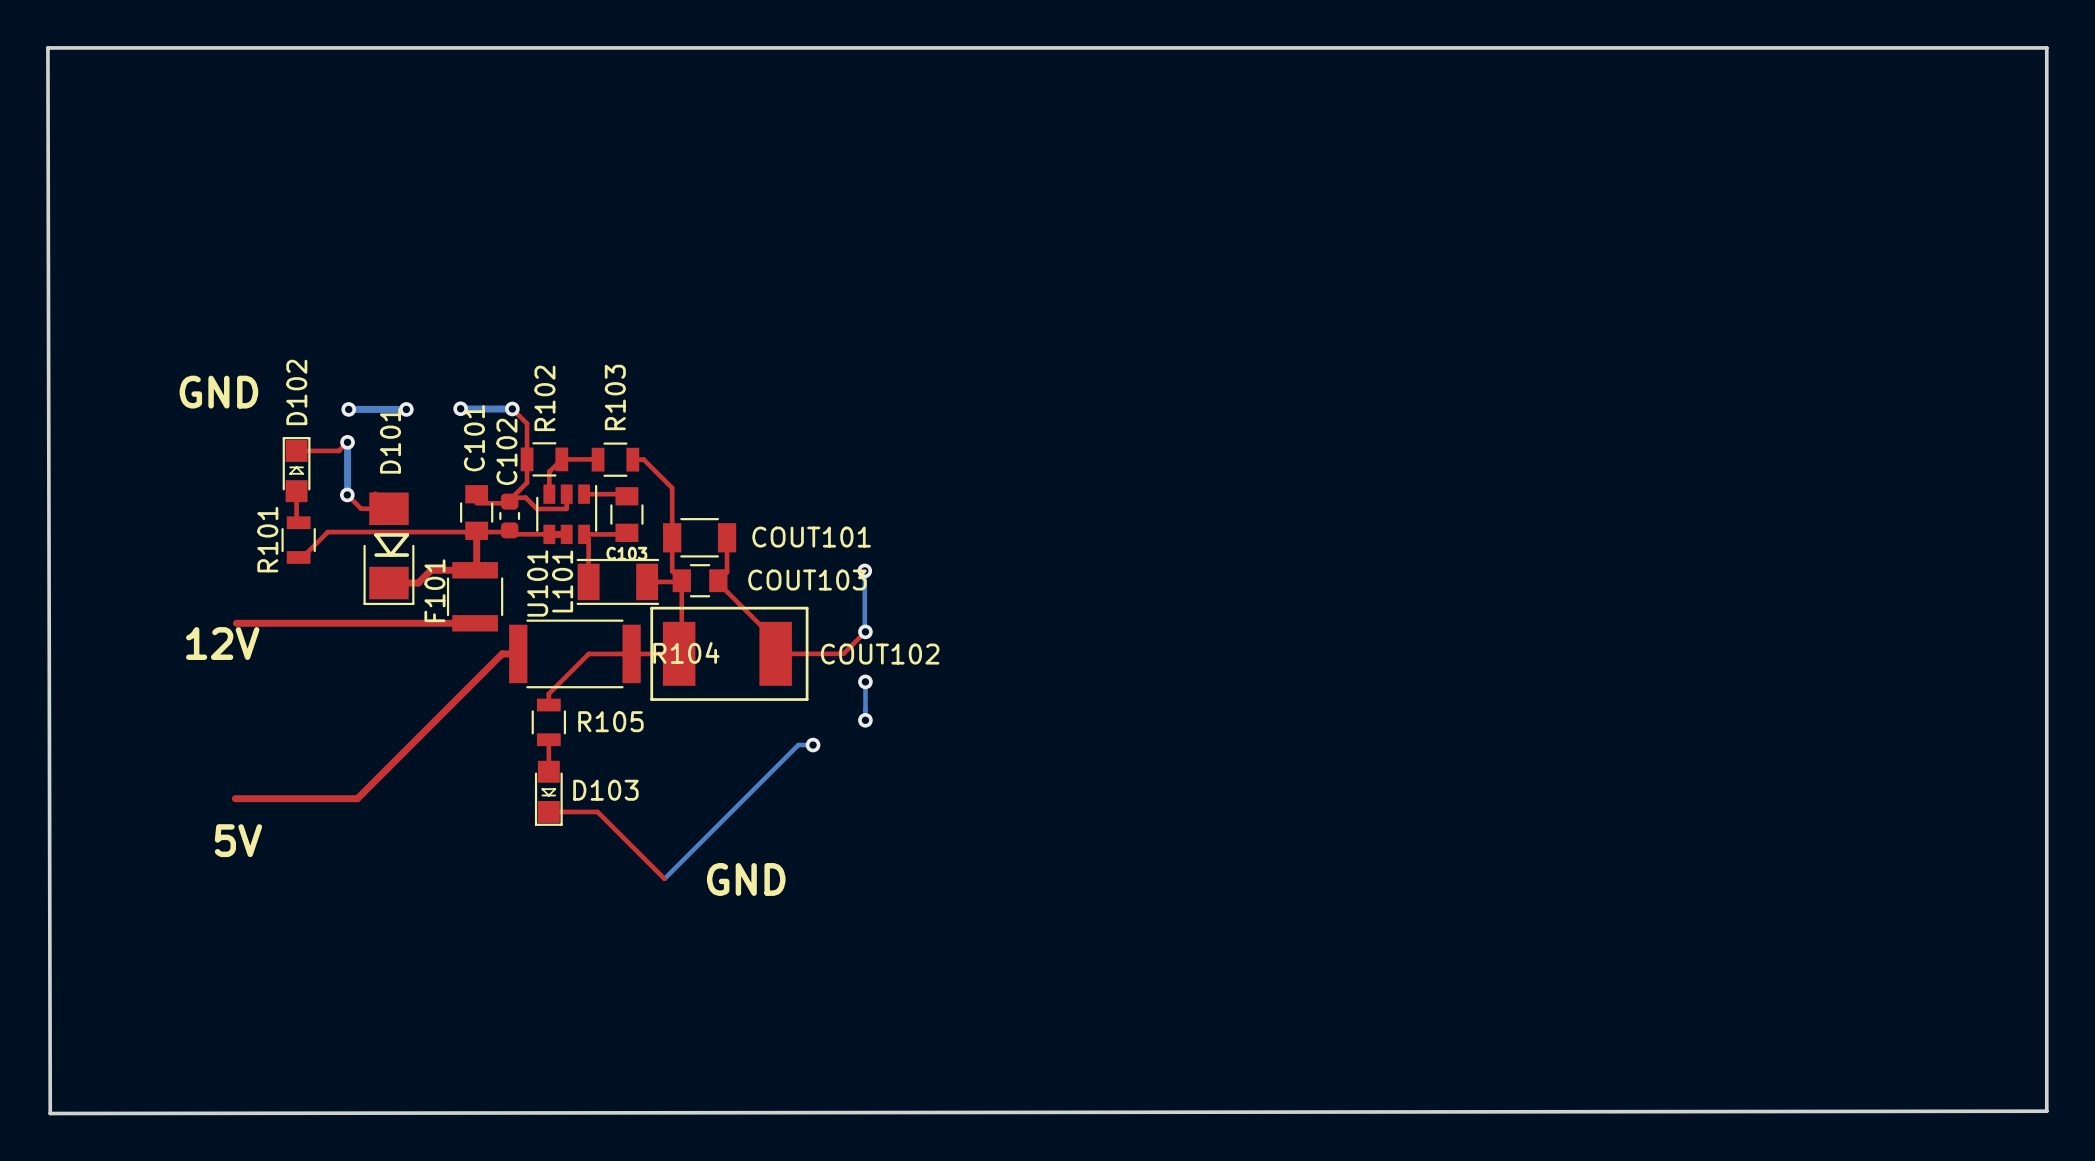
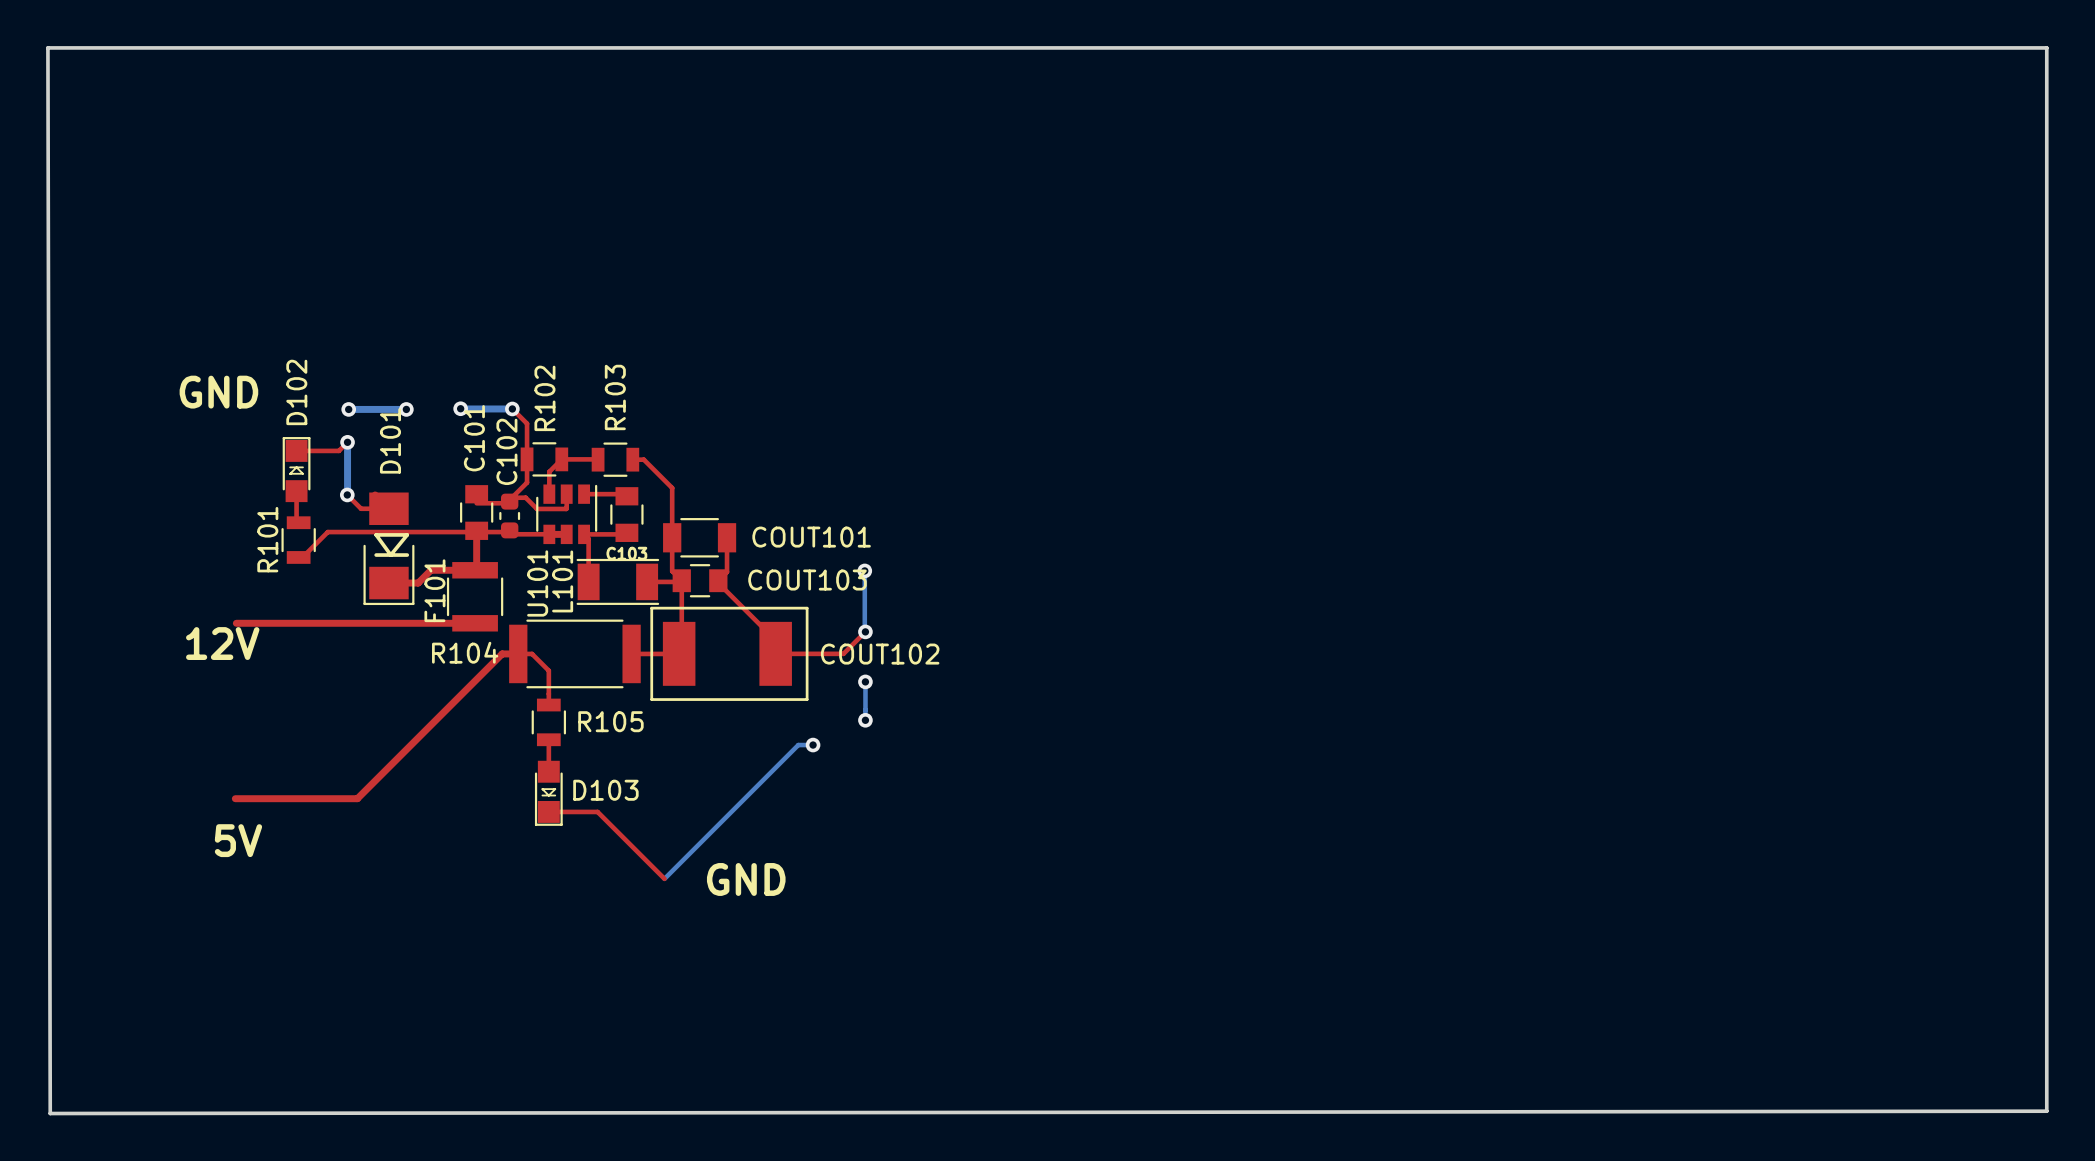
R104 name position: R104 (686, 652) -> R104 (465, 652)
top track: (631, 653) (588, 653) (548, 693) -> (518, 653) (532, 653) (548, 670) (548, 693)

